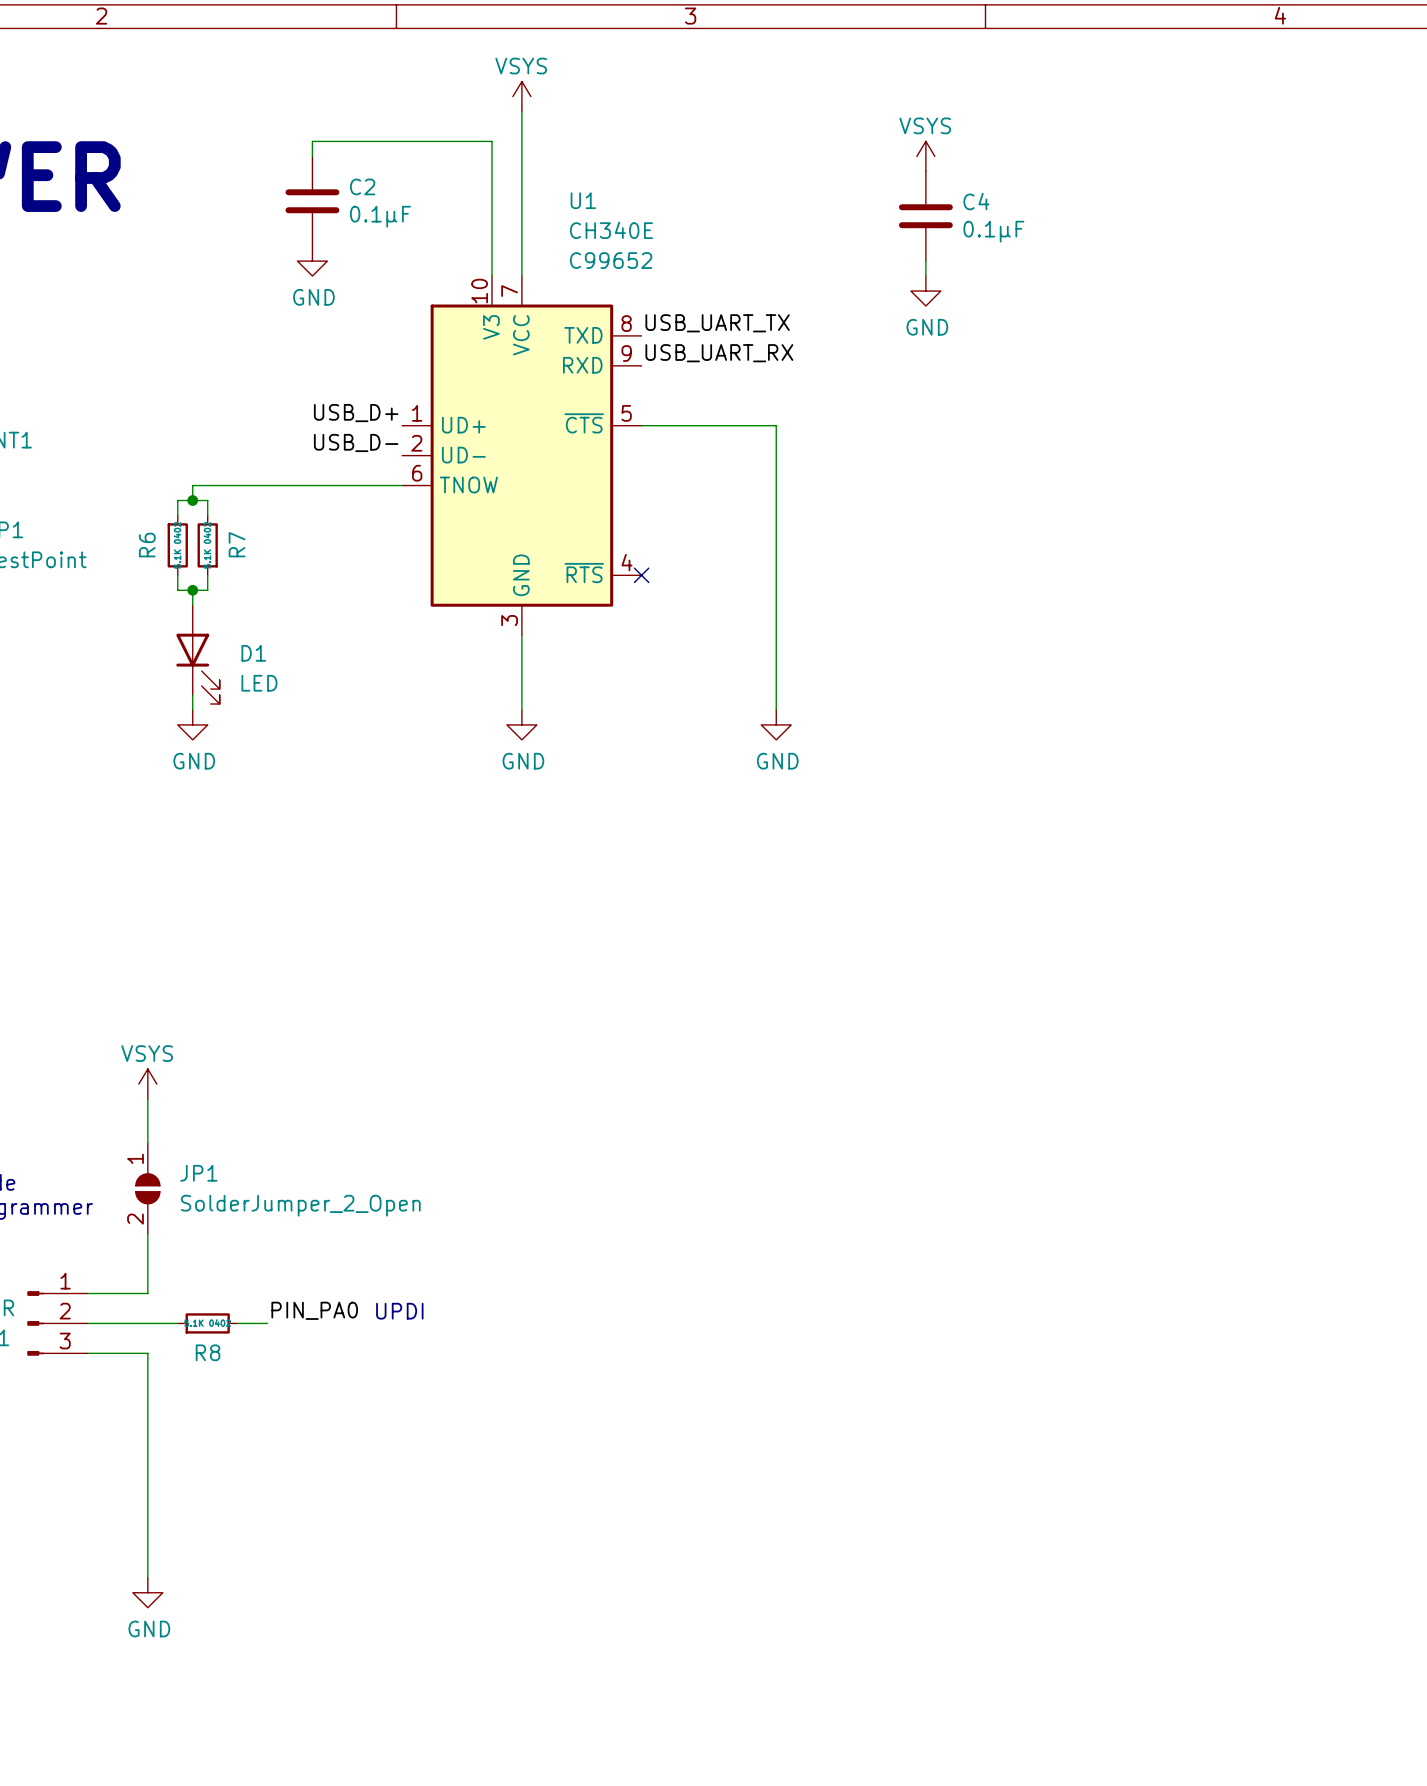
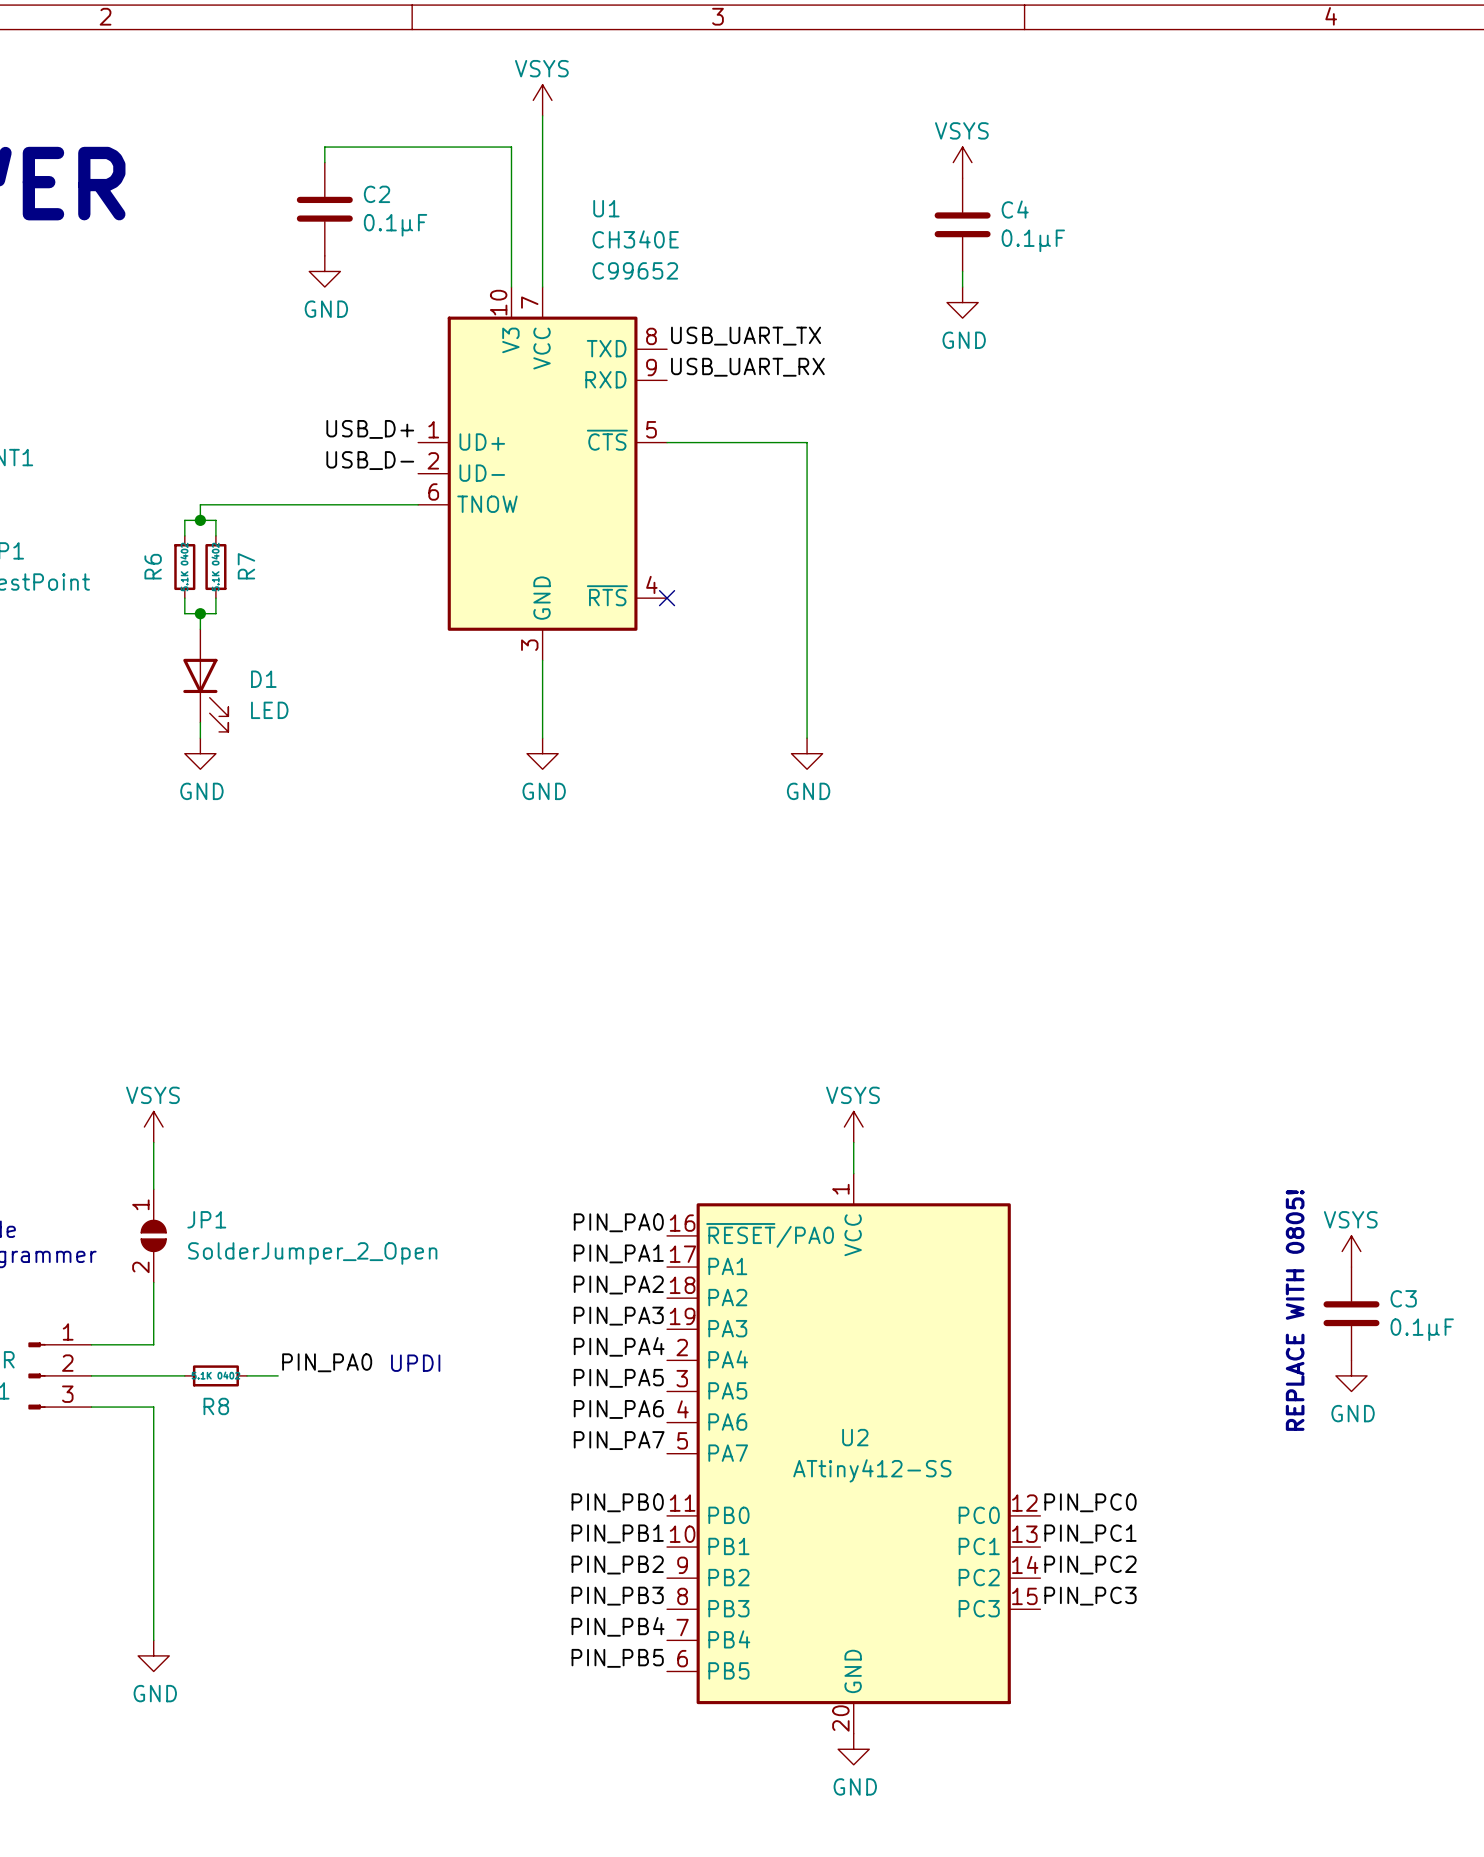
power symbol: none -> VSYS (853, 1127)
wire: none -> (853, 1142) (853, 1173)
label: none -> PIN_PA0 (618, 1222)
power symbol: none -> VSYS (1351, 1251)
label: none -> PIN_PA1 (618, 1253)
label: none -> PIN_PA2 (618, 1285)
text: none -> REPLACE WITH 0805! (1295, 1310)
C3: none -> 0.1μF (1351, 1313)
label: none -> PIN_PA3 (618, 1316)
label: none -> PIN_PA4 (619, 1346)
power symbol: none -> GND (1351, 1375)
label: none -> PIN_PA5 (618, 1378)
label: none -> PIN_PA6 (618, 1409)
label: none -> PIN_PA7 (619, 1440)
U2: none -> ATtiny412-SS (853, 1453)
label: none -> PIN_PB0 (617, 1502)
label: none -> PIN_PC0 (1090, 1502)
label: none -> PIN_PB1 (617, 1533)
label: none -> PIN_PC1 (1090, 1533)
label: none -> PIN_PB2 (617, 1565)
label: none -> PIN_PC2 (1090, 1565)
label: none -> PIN_PB3 (617, 1596)
label: none -> PIN_PC3 (1090, 1596)
label: none -> PIN_PB4 (618, 1626)
label: none -> PIN_PB5 (617, 1658)
power symbol: none -> GND (853, 1749)

